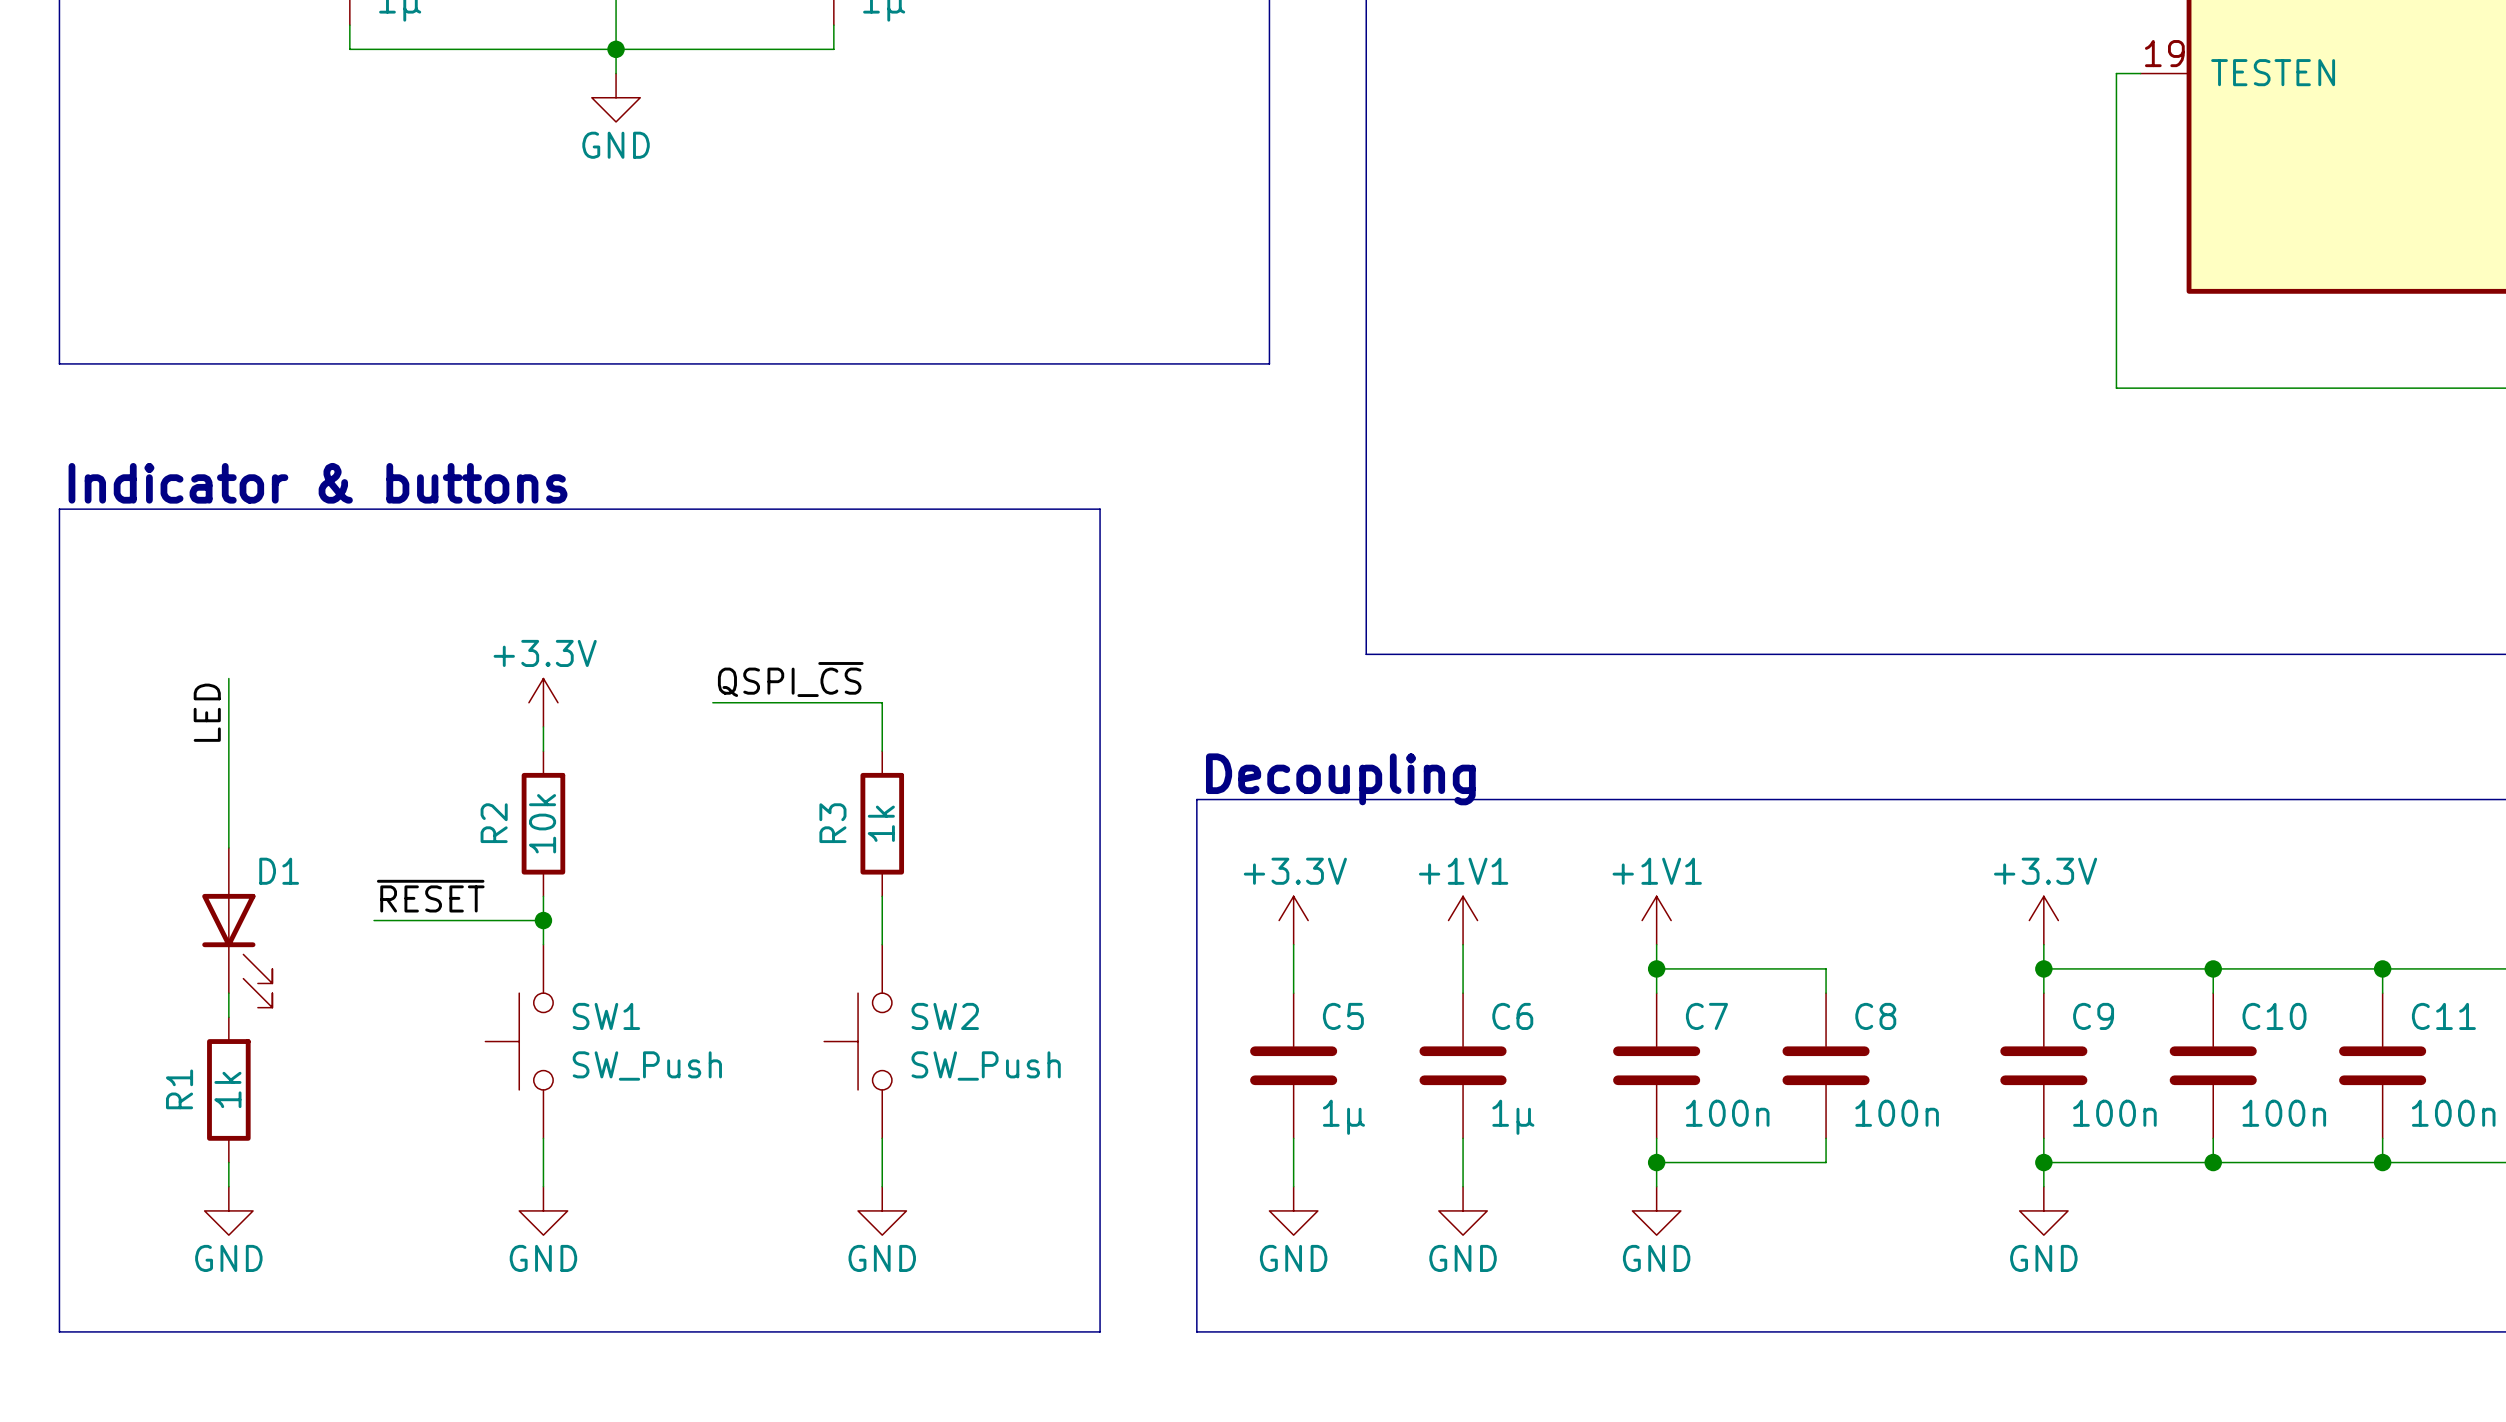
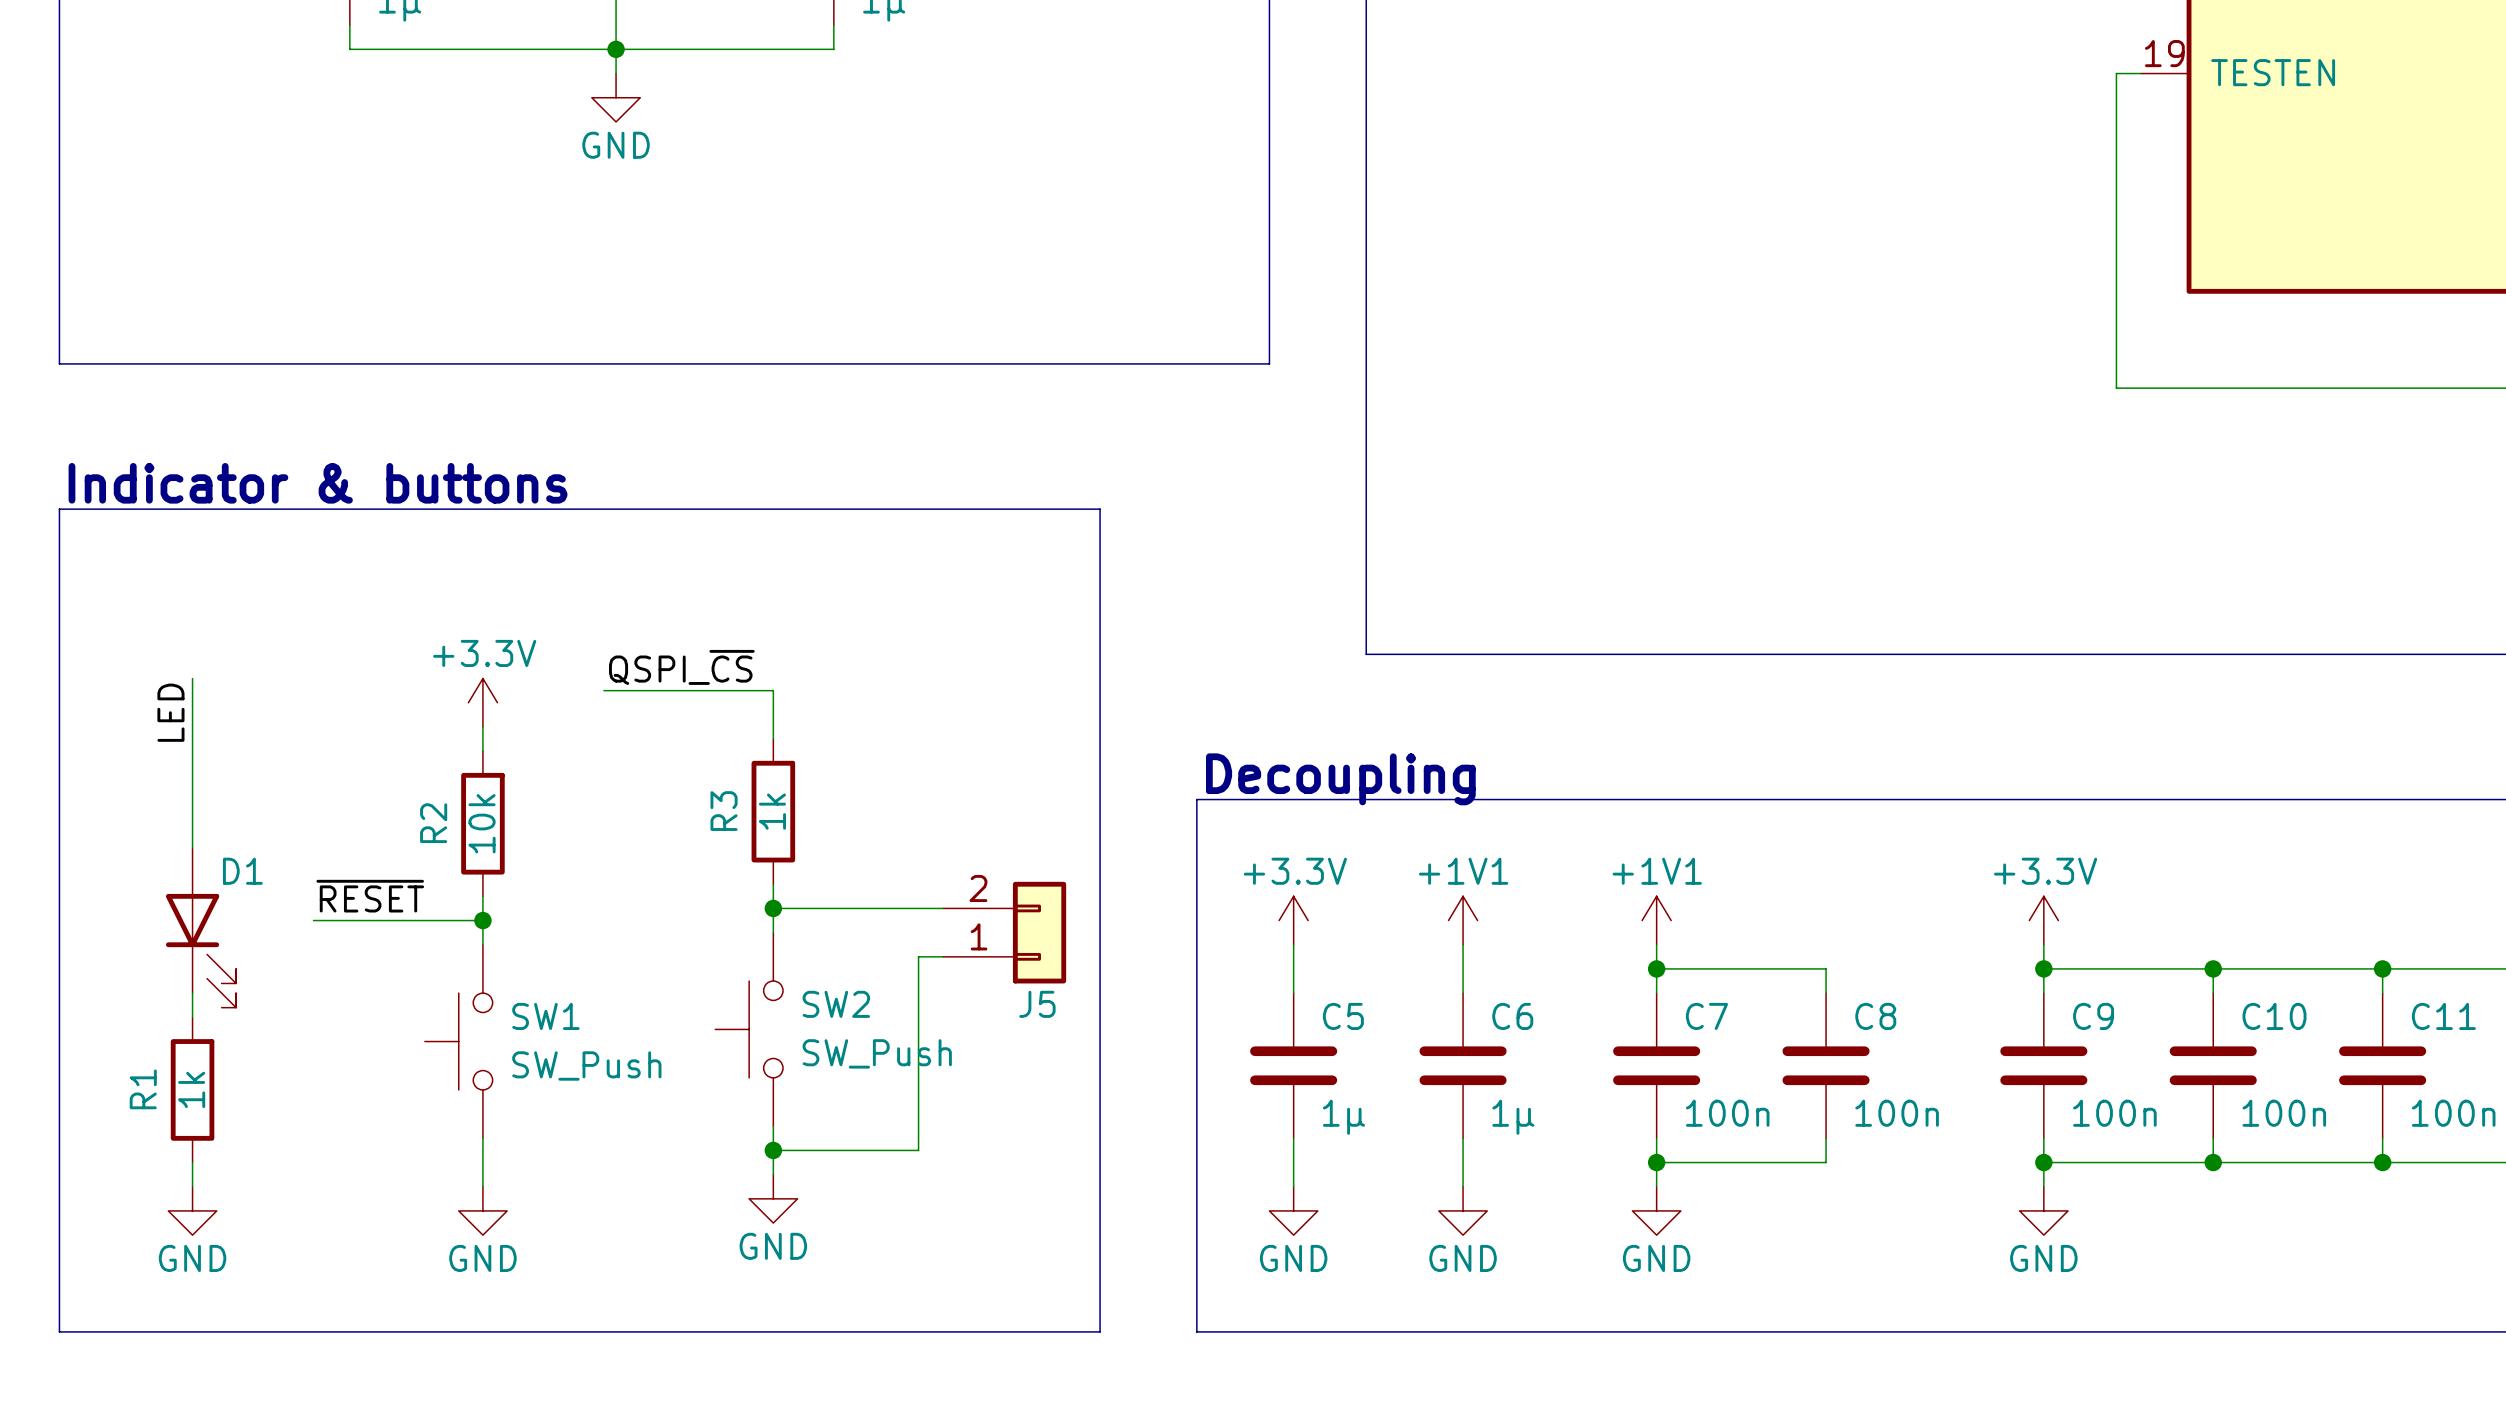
wire: (228, 678) (228, 847) -> (192, 678) (192, 847)
label position: QSPI_~{CS} (790, 679) -> QSPI_~{CS} (681, 667)
power symbol position: +3.3V (543, 702) -> +3.3V (482, 702)
wire: (712, 702) (882, 702) (882, 751) -> (603, 690) (773, 690) (773, 739)
label position: LED (207, 712) -> LED (170, 712)
wire: (543, 726) (543, 751) -> (482, 726) (482, 751)
R2 position: (543, 823) -> (482, 823)
R3 position: (882, 823) -> (773, 811)
label position: ~{RESET} (430, 896) -> ~{RESET} (370, 896)
wire: (543, 896) (543, 944) -> (482, 896) (482, 944)
wire: (882, 896) (882, 944) -> (773, 884) (773, 932)
wire: none -> (773, 908) (942, 908)
junction: none -> (773, 908)
wire: (482, 920) (543, 920) -> (313, 920) (374, 920)
junction position: (543, 920) -> (482, 920)
D1 position: (237, 927) -> (201, 927)
J5: none -> (1004, 932)
wire: none -> (942, 956) (918, 956) (918, 1150) (773, 1150)
wire: (228, 993) (228, 1017) -> (192, 993) (192, 1017)
SW1 position: (519, 1041) -> (458, 1041)
SW2 position: (858, 1041) -> (749, 1029)
R1 position: (228, 1089) -> (192, 1089)
wire: (543, 1138) (543, 1186) -> (482, 1138) (482, 1186)
wire: (882, 1138) (882, 1186) -> (773, 1126) (773, 1174)
junction: none -> (773, 1150)
wire: (228, 1162) (228, 1186) -> (192, 1162) (192, 1186)
power symbol position: GND (228, 1210) -> GND (192, 1210)
power symbol position: GND (543, 1210) -> GND (482, 1210)
power symbol position: GND (882, 1210) -> GND (773, 1198)

